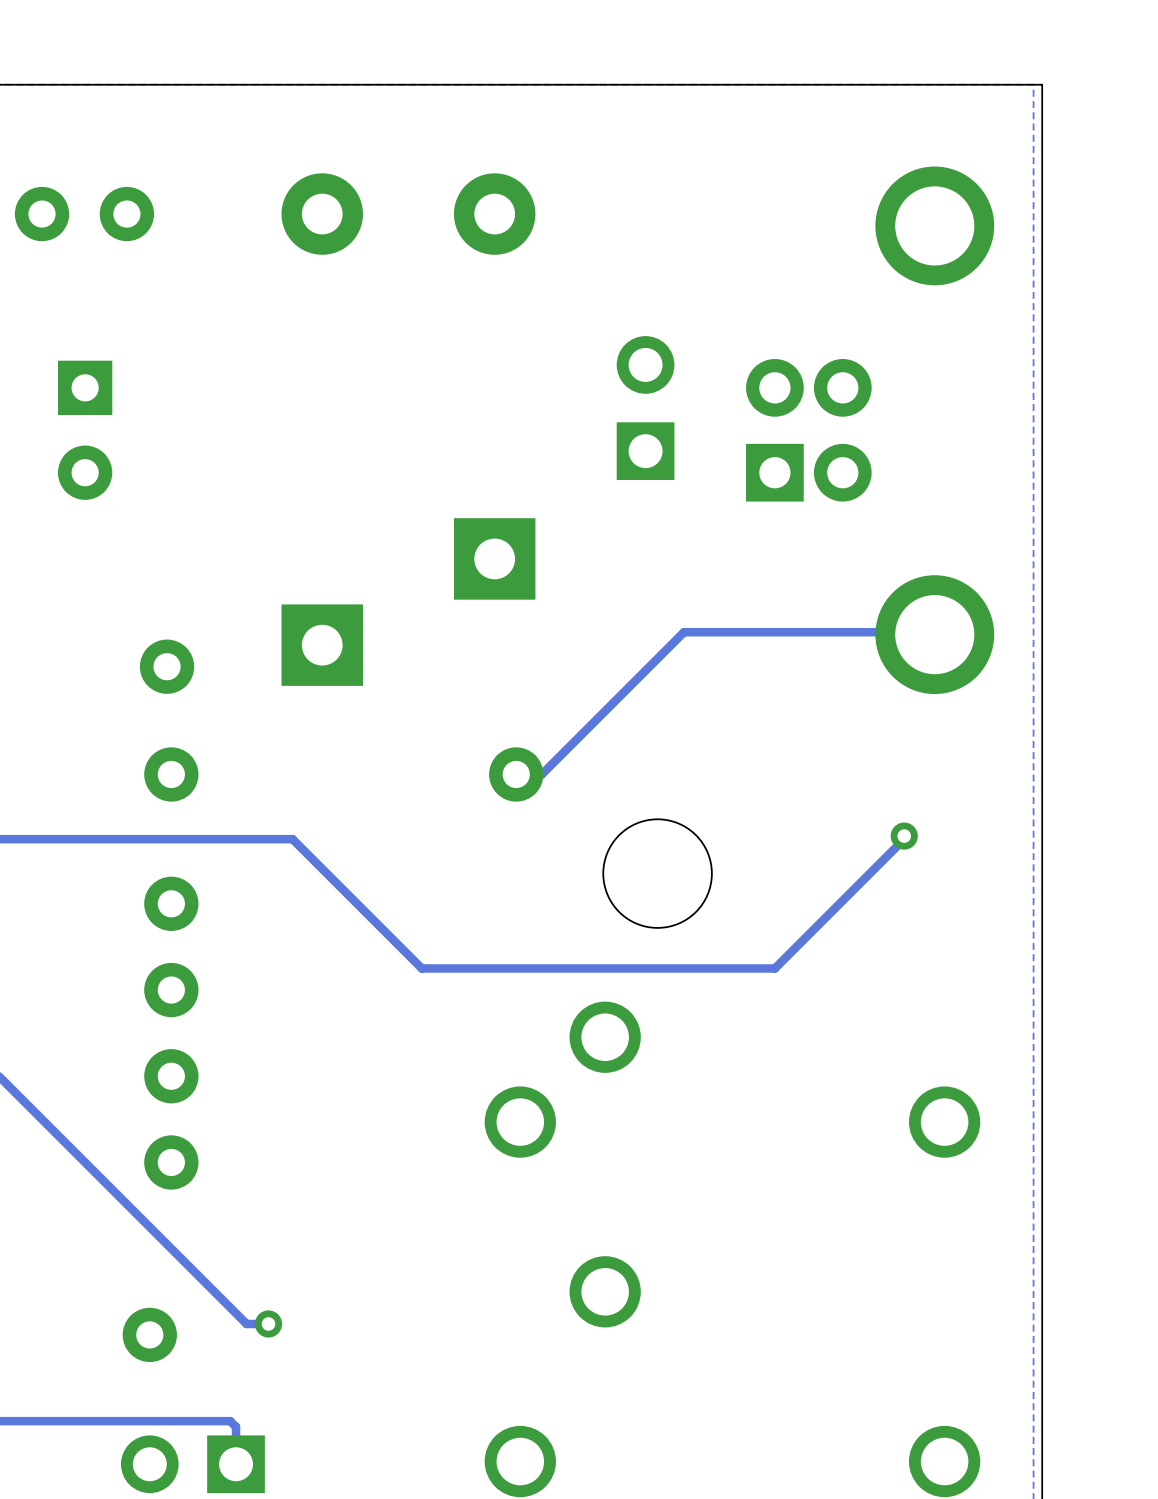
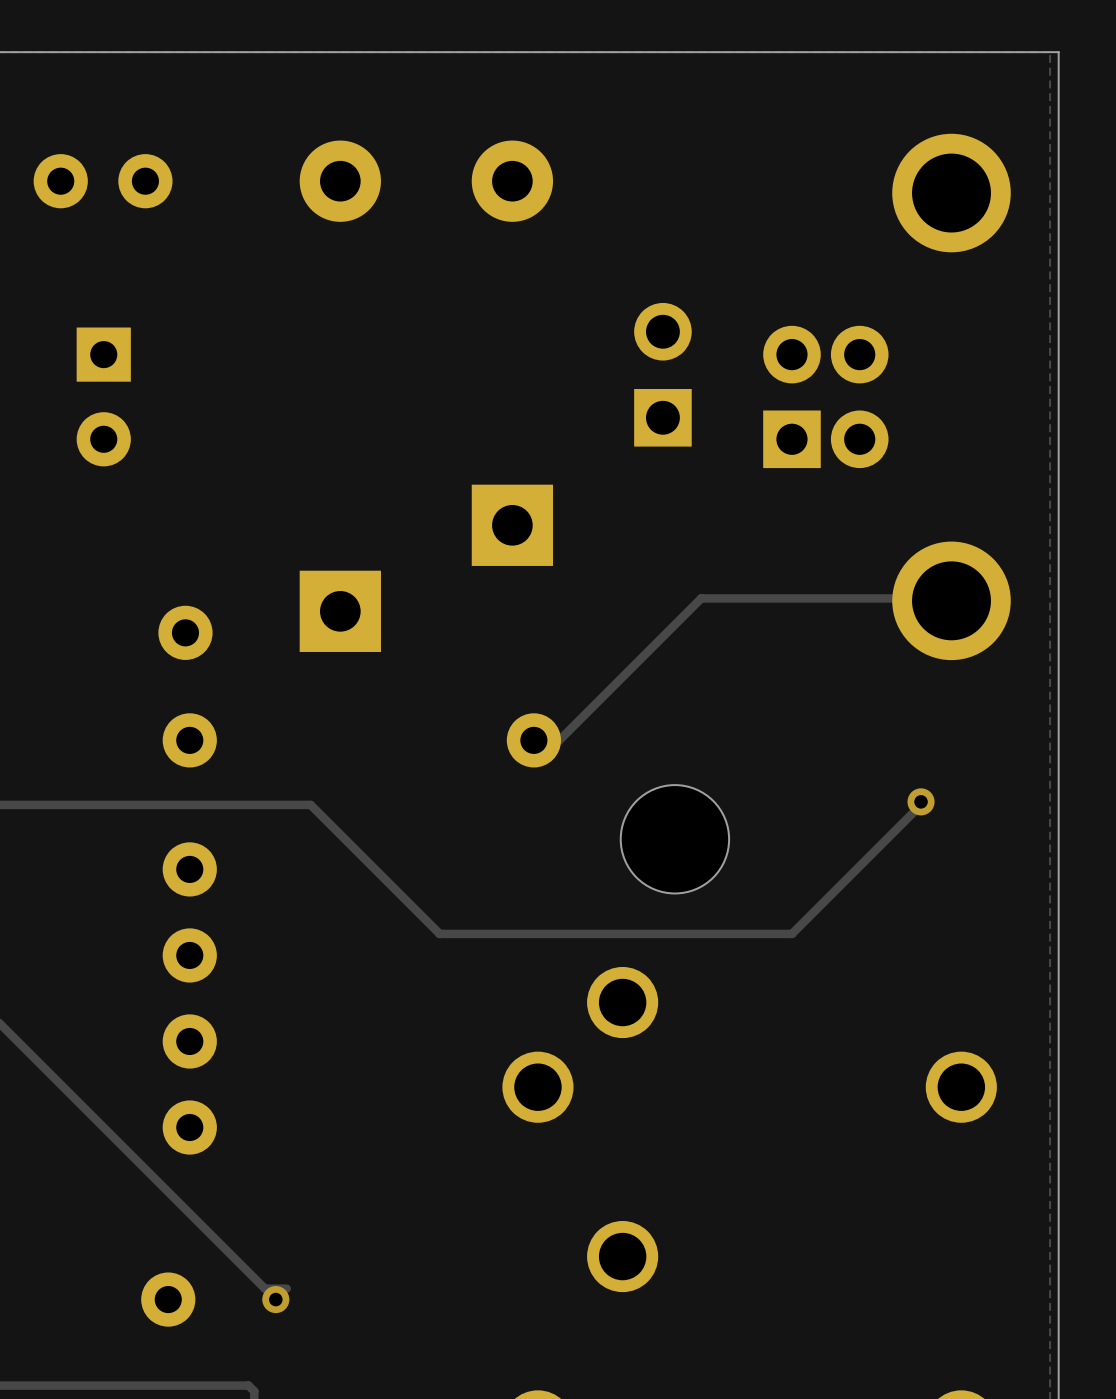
via position: (268, 1323) -> (275, 1299)

